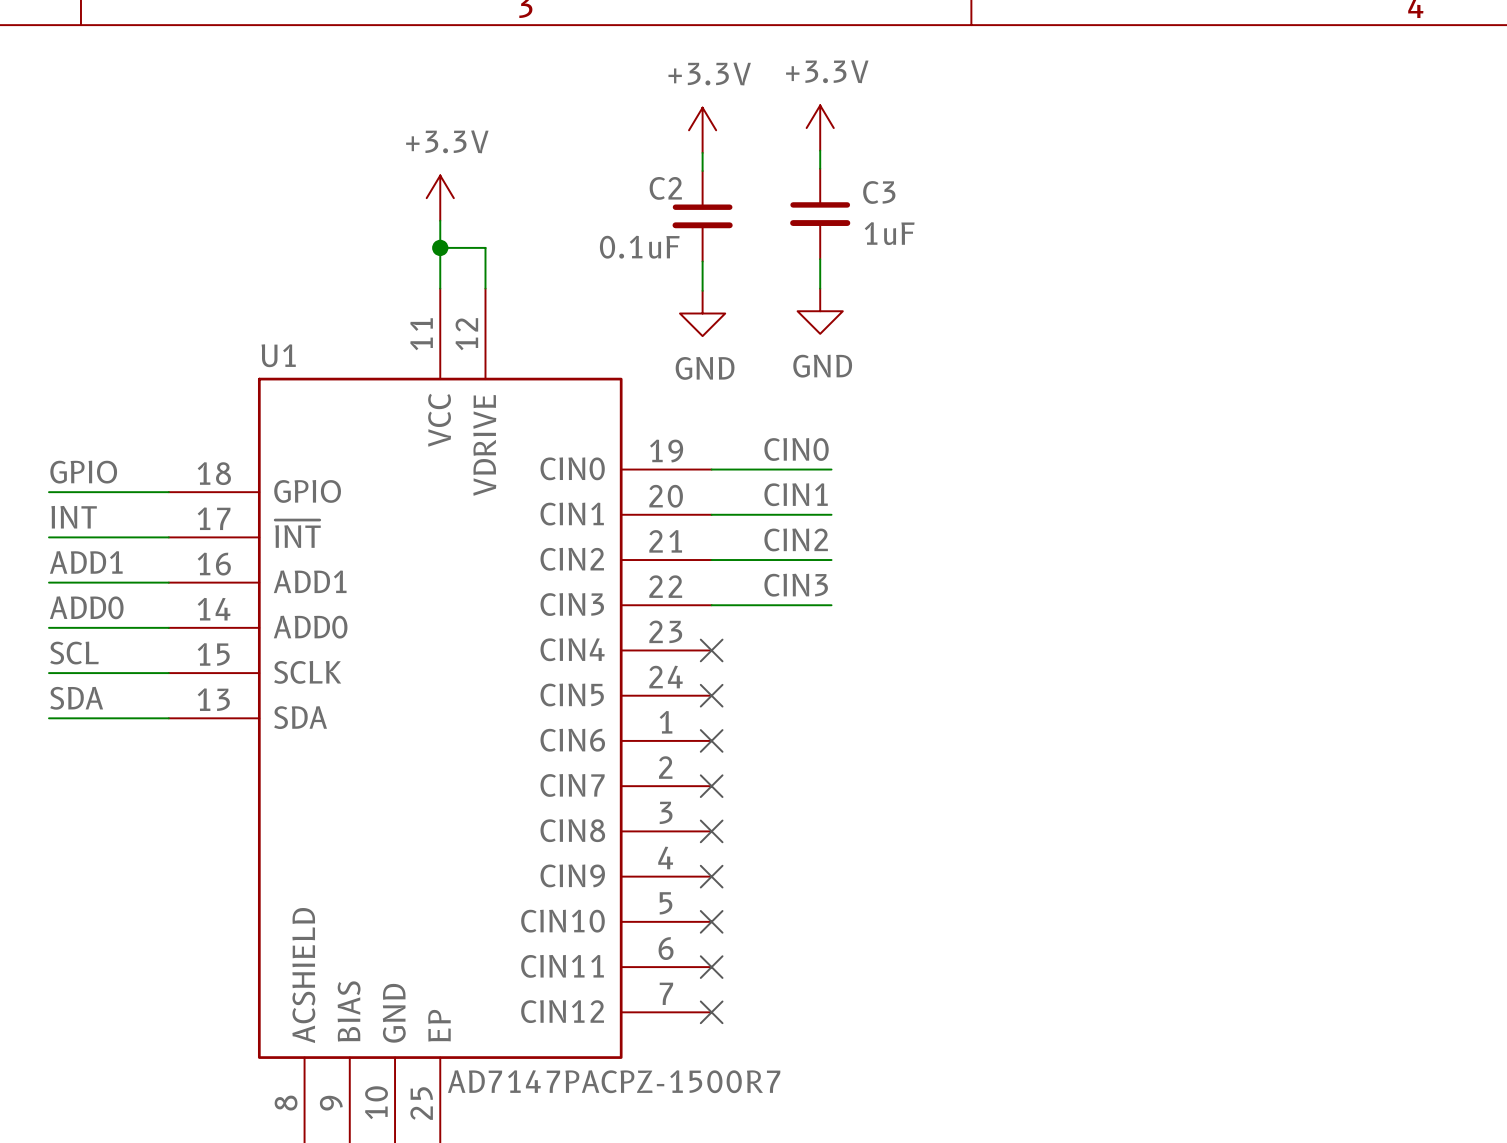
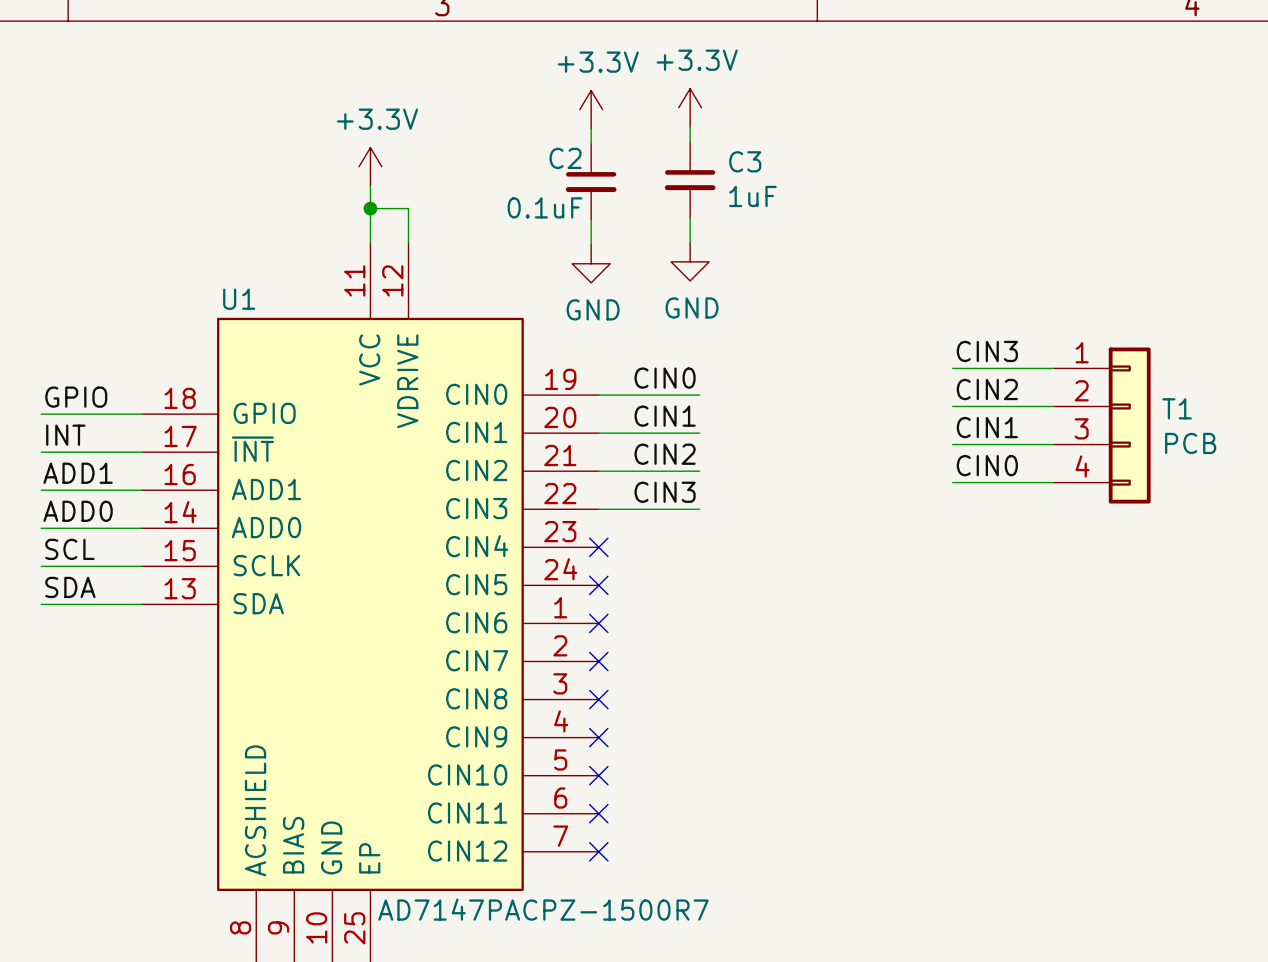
label: none -> CIN3 (987, 351)
wire: none -> (952, 368) (1053, 368)
label: none -> CIN2 (987, 389)
wire: none -> (952, 406) (1053, 406)
T1: none -> PCB (1102, 425)
label: none -> CIN1 (987, 427)
wire: none -> (952, 444) (1053, 444)
label: none -> CIN0 (987, 465)
wire: none -> (952, 482) (1053, 482)

